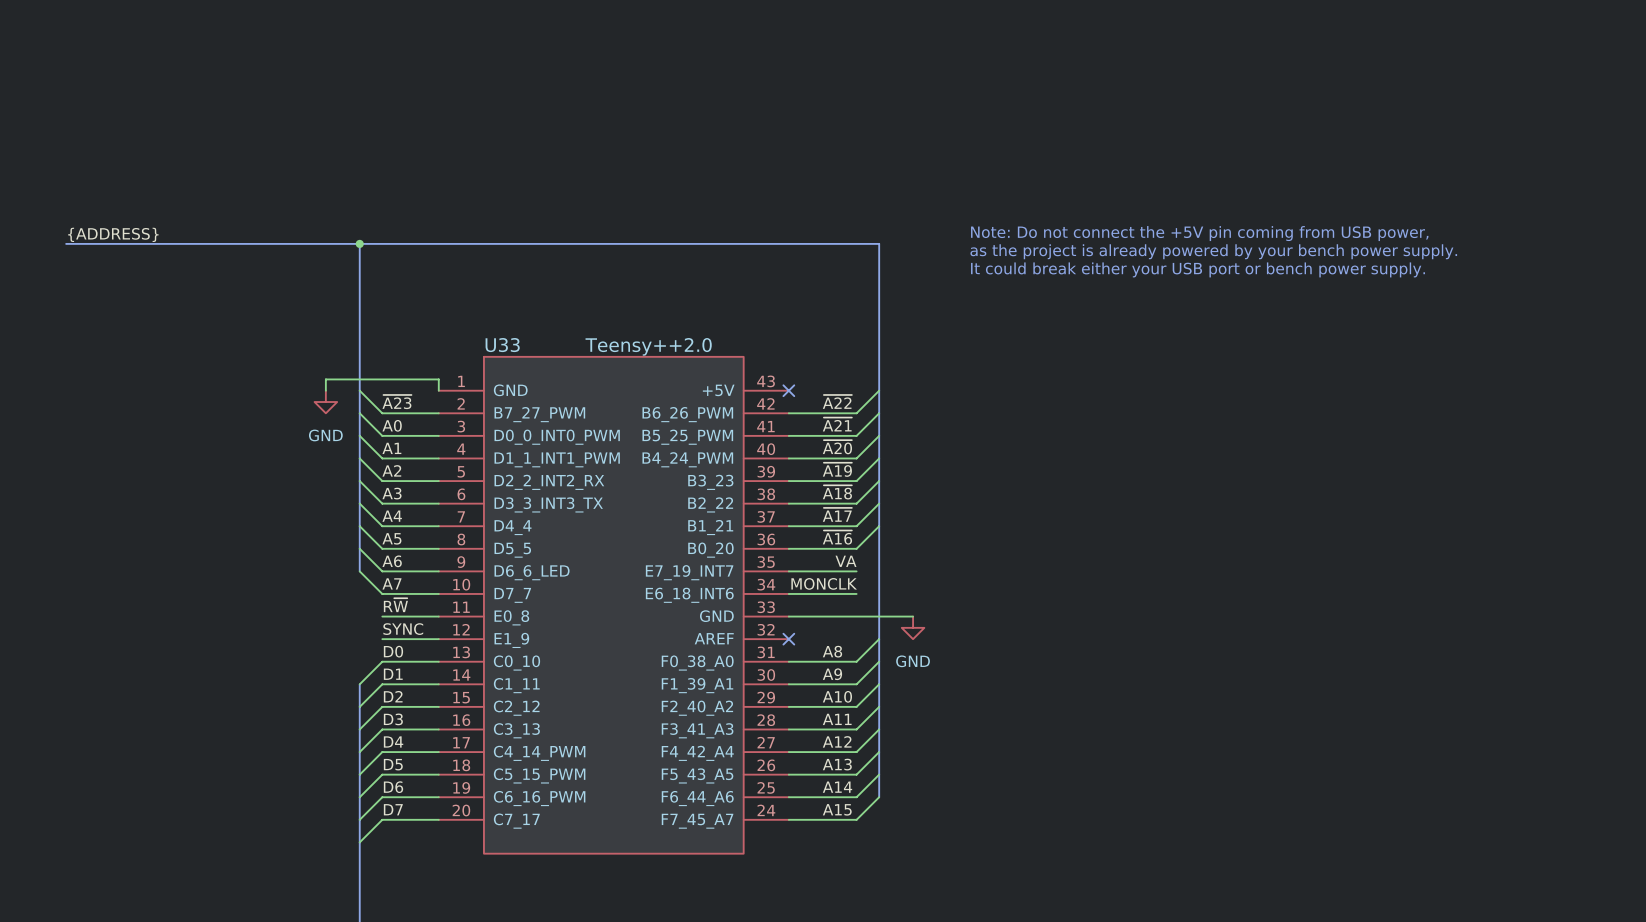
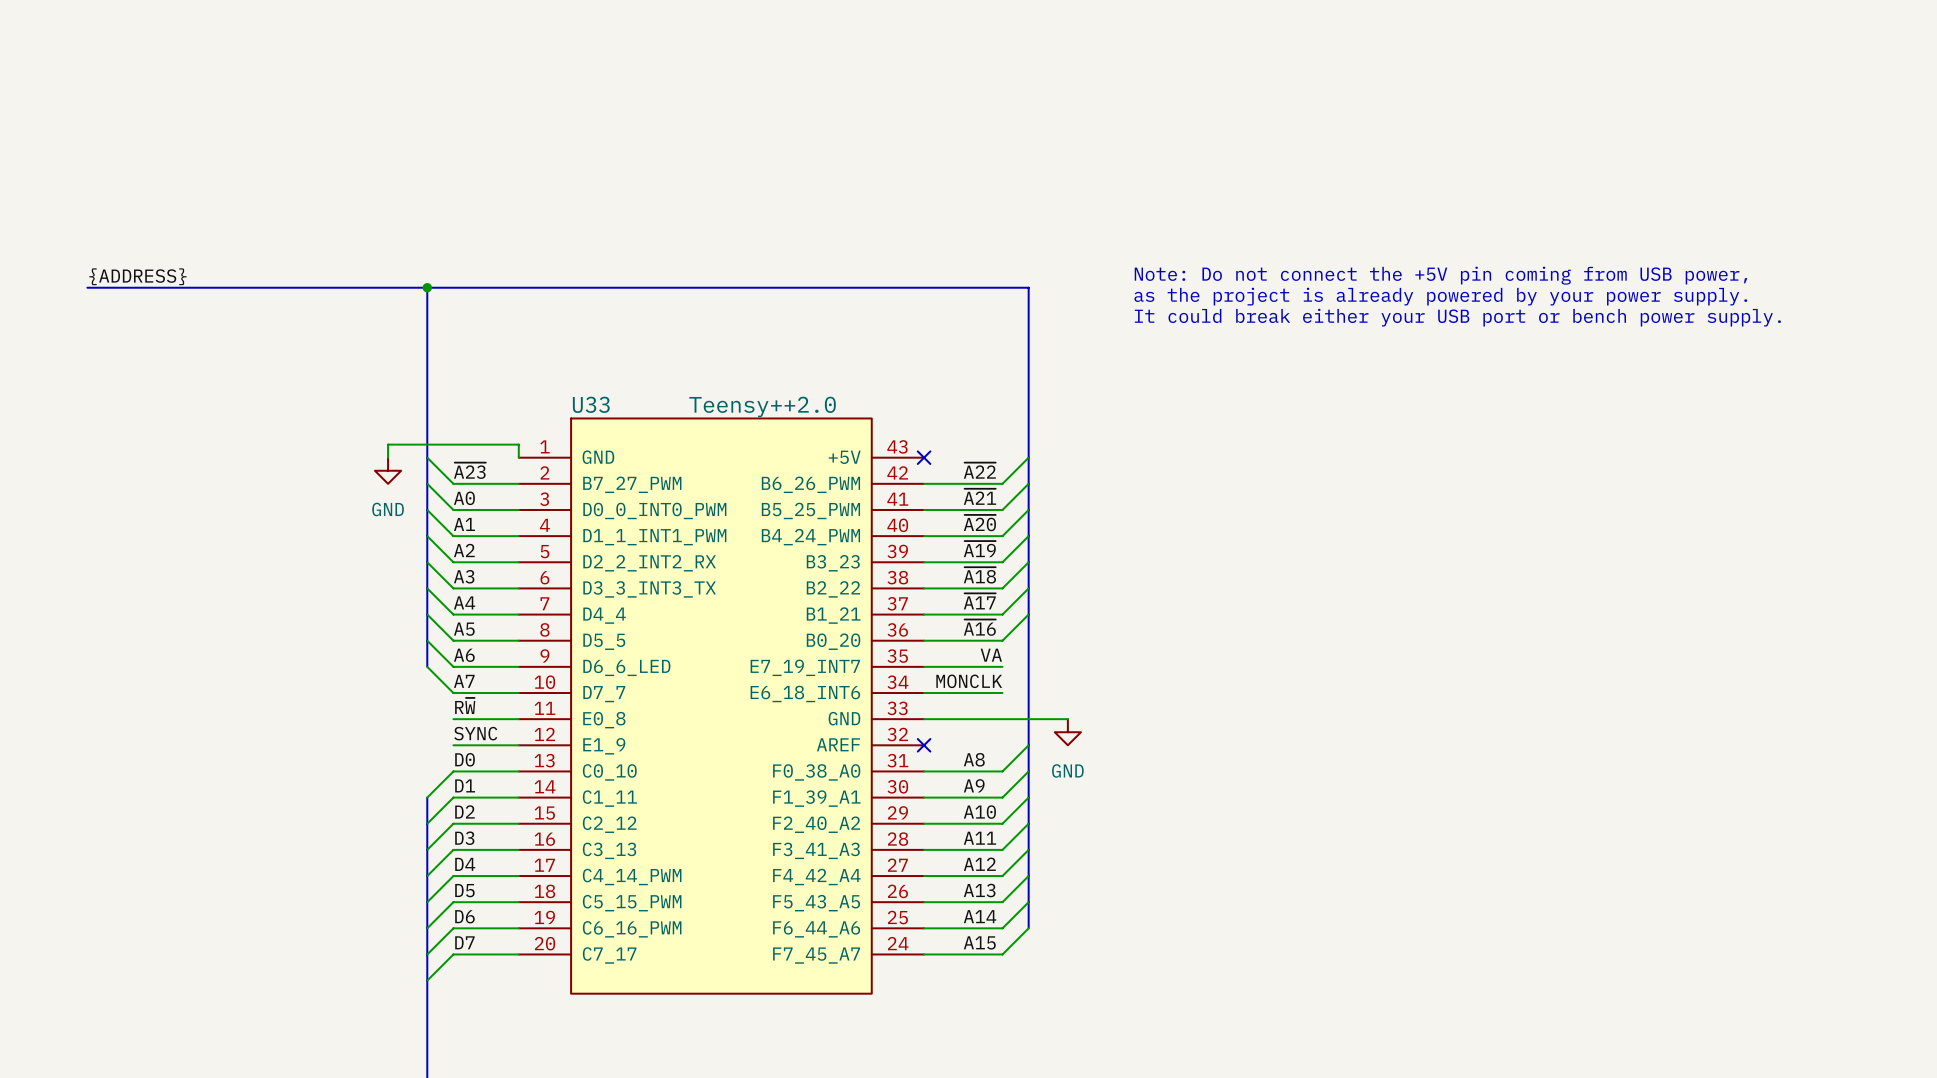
text: as the project is already powered by your bench power supply. (1213, 251) -> as the project is already powered by your power supply. (1440, 296)

